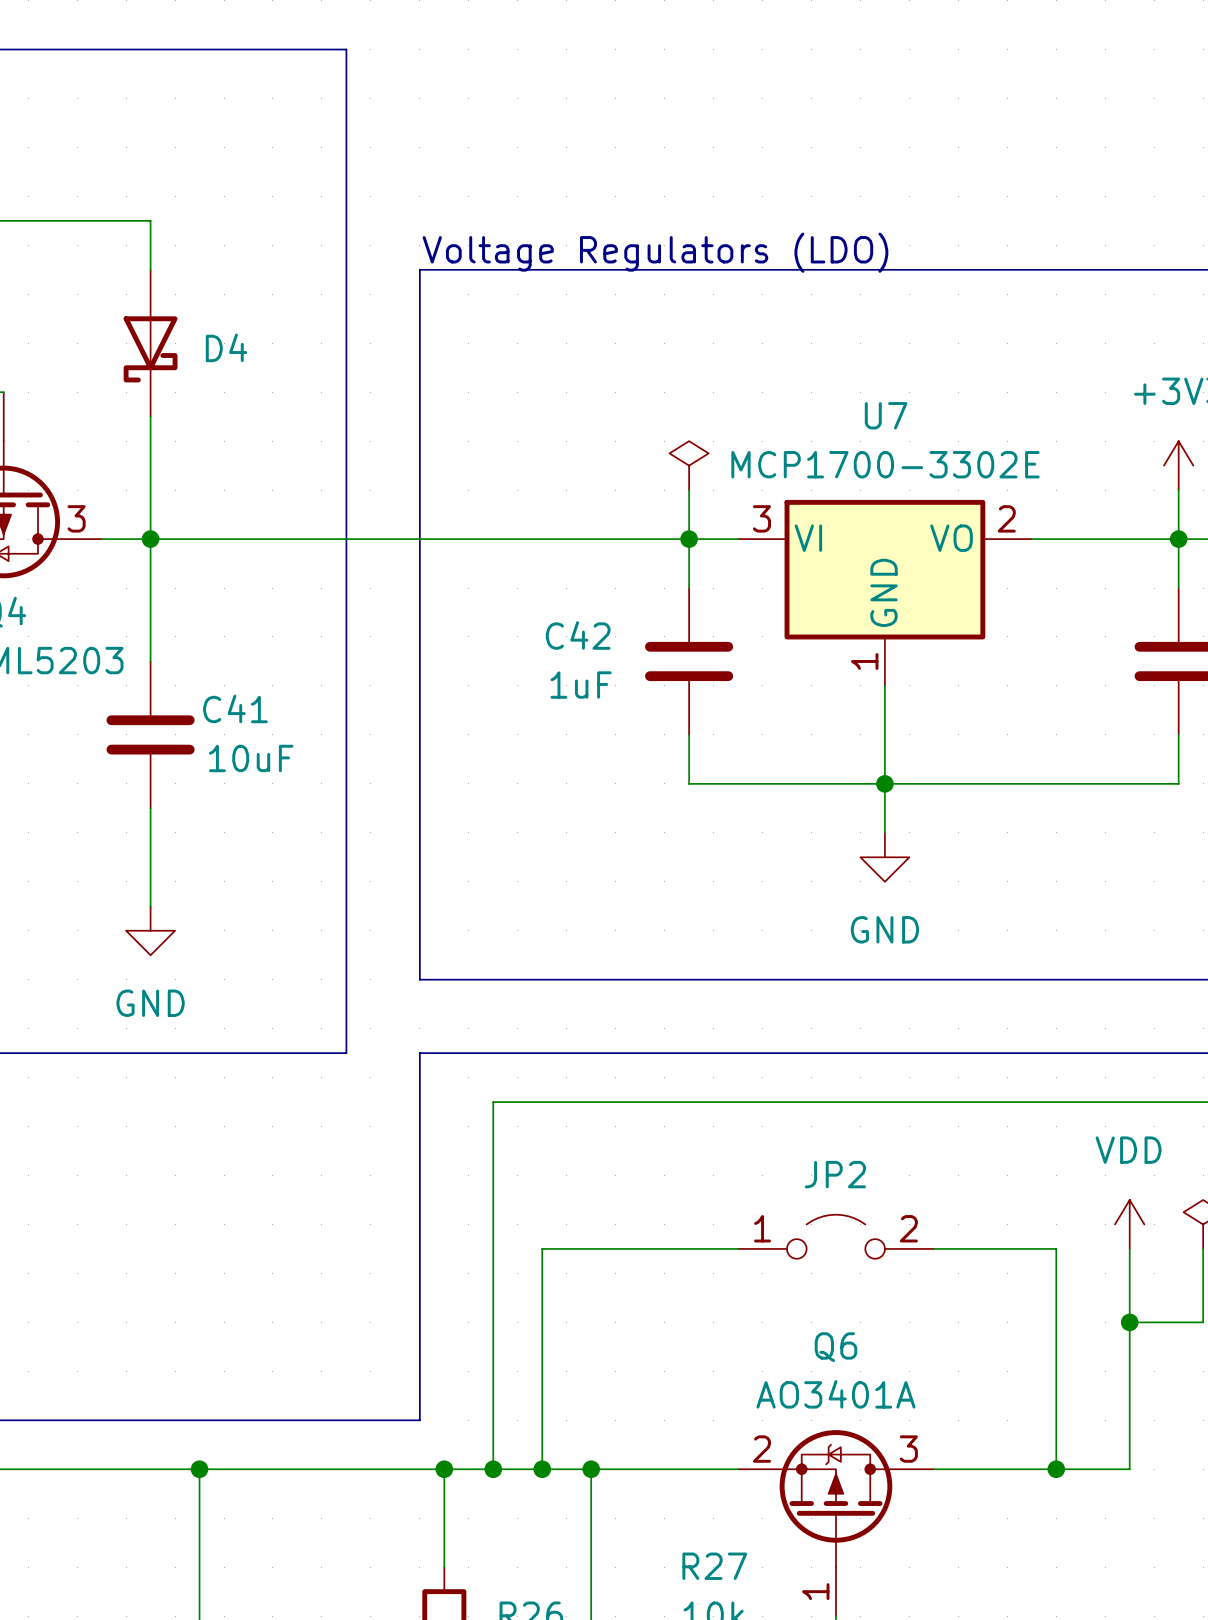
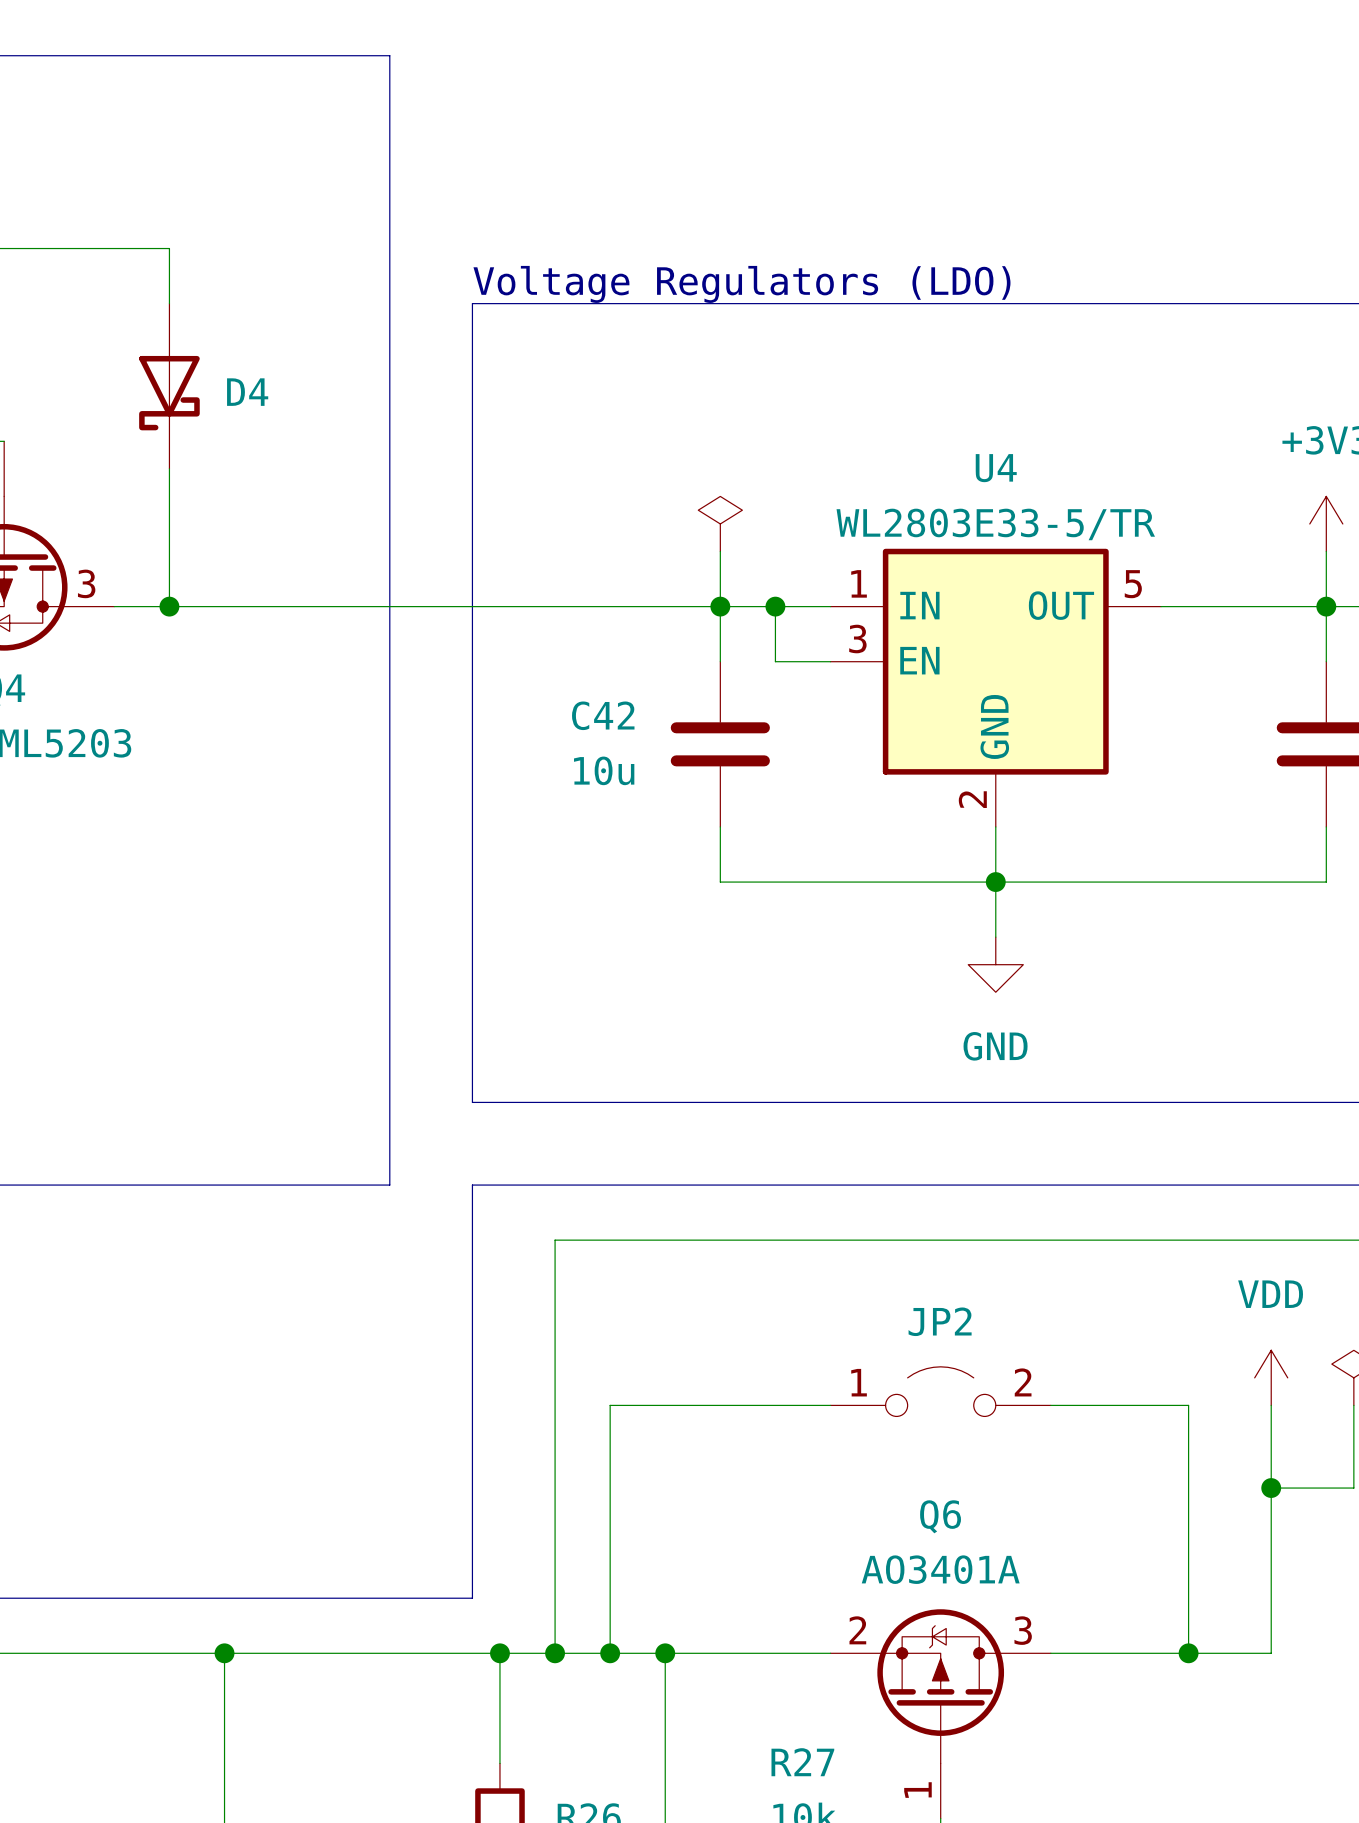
power symbol position: (689, 465) -> (720, 523)
wire: none -> (720, 551) (720, 661)
wire: (689, 490) (689, 539) -> none
wire: (150, 539) (150, 661) -> none
junction: none -> (720, 606)
wire: none -> (775, 661) (830, 661)
U7: MCP1700-3302E (884, 592) -> none
U4: none -> WL2803E33-5/TR (995, 687)
C42 position: (689, 661) -> (720, 744)
C42 value: 1uF (581, 685) -> 10u (604, 770)
C41: 10uF (150, 734) -> none
wire: (689, 734) (689, 783) -> (720, 826) (720, 882) (775, 882)
wire: (150, 808) (150, 906) -> none
power symbol: GND (150, 930) -> none

